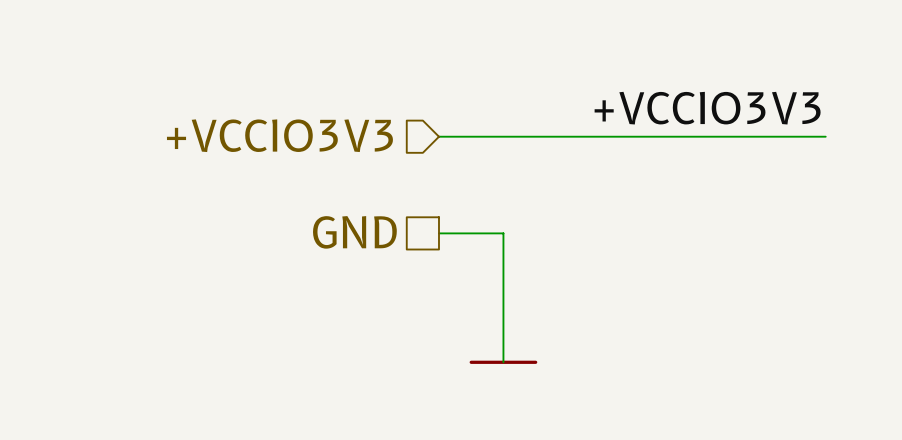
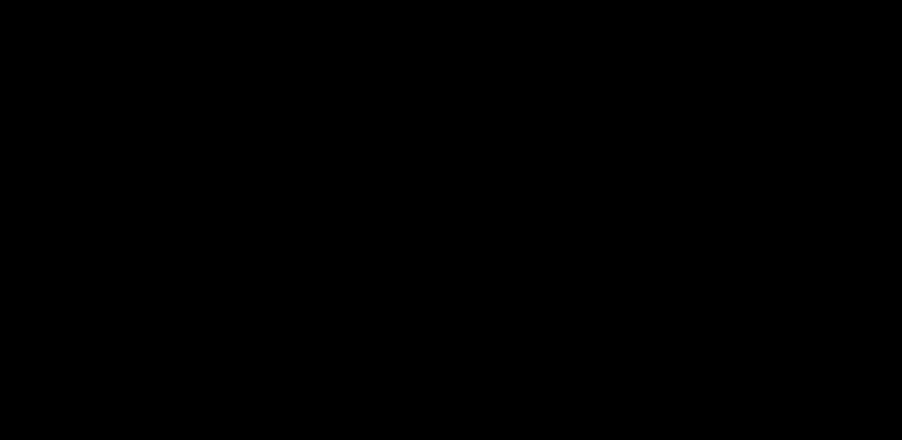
label: +VCCIO3V3 (707, 108) -> none
hierarchical label: +VCCIO3V3 (279, 135) -> none
wire: (438, 136) (825, 136) -> none
hierarchical label: GND (354, 232) -> none
wire: (438, 233) (503, 233) (503, 362) -> none
power symbol: (503, 362) -> none

